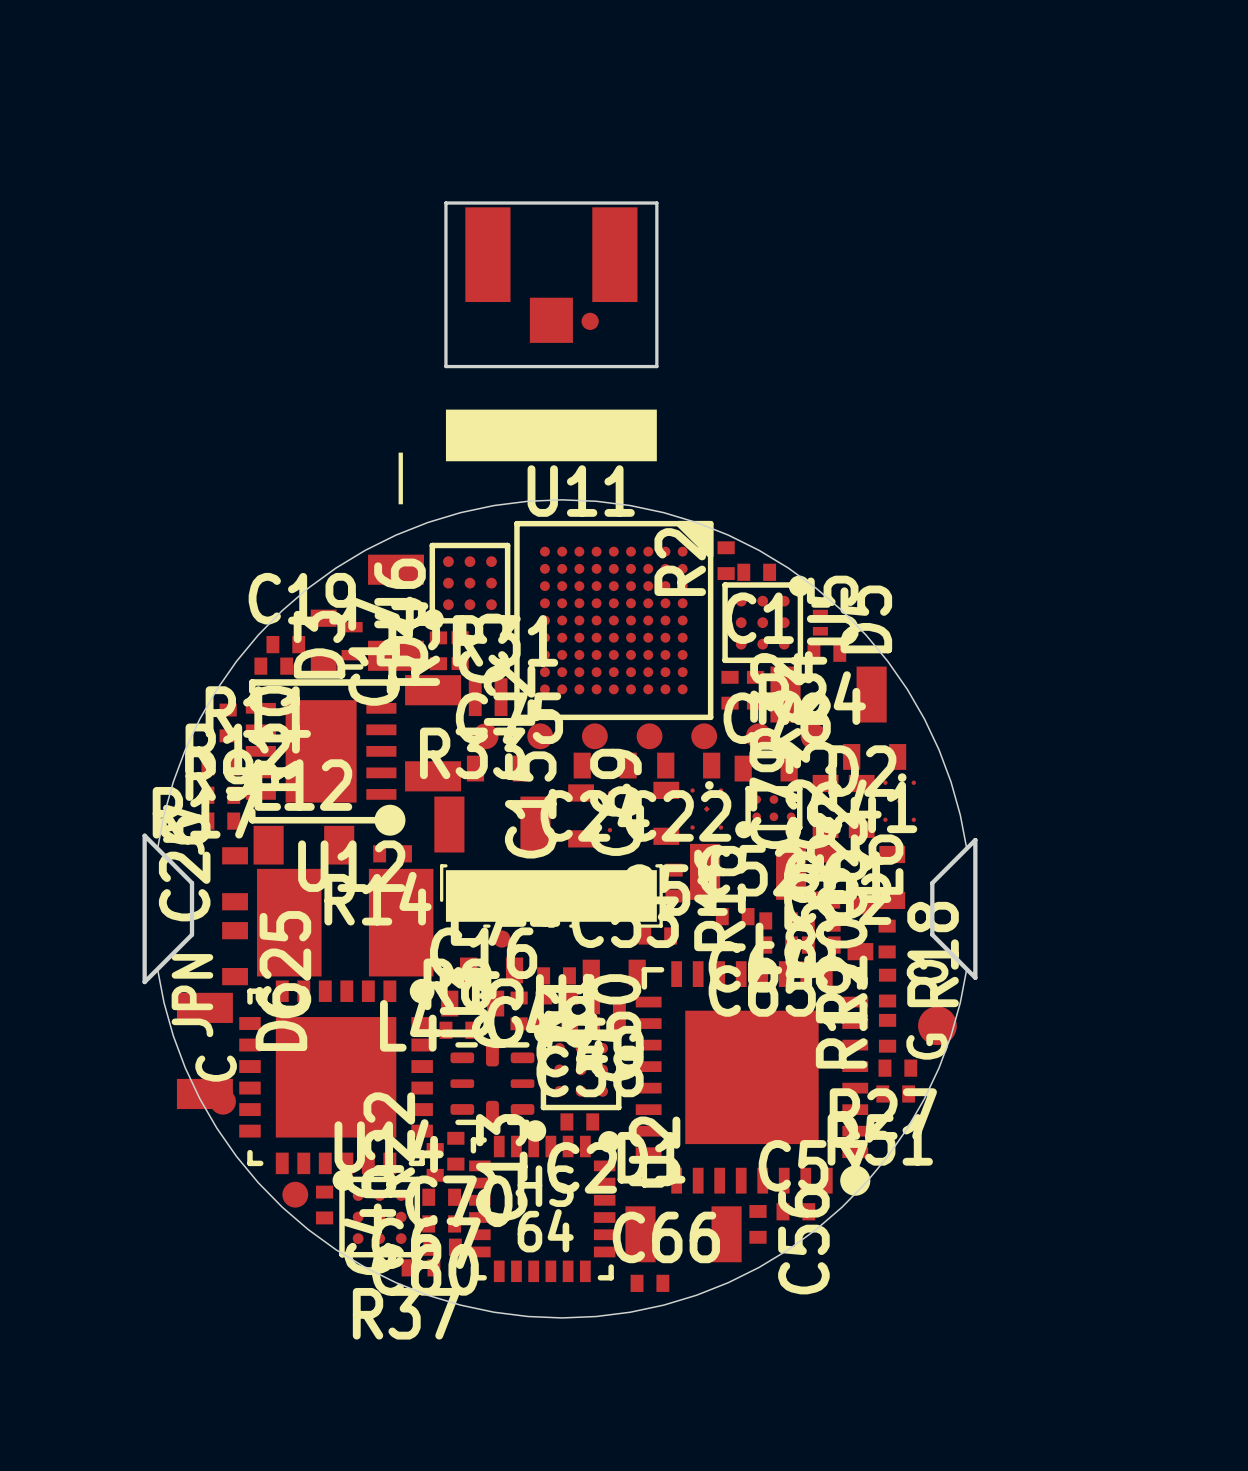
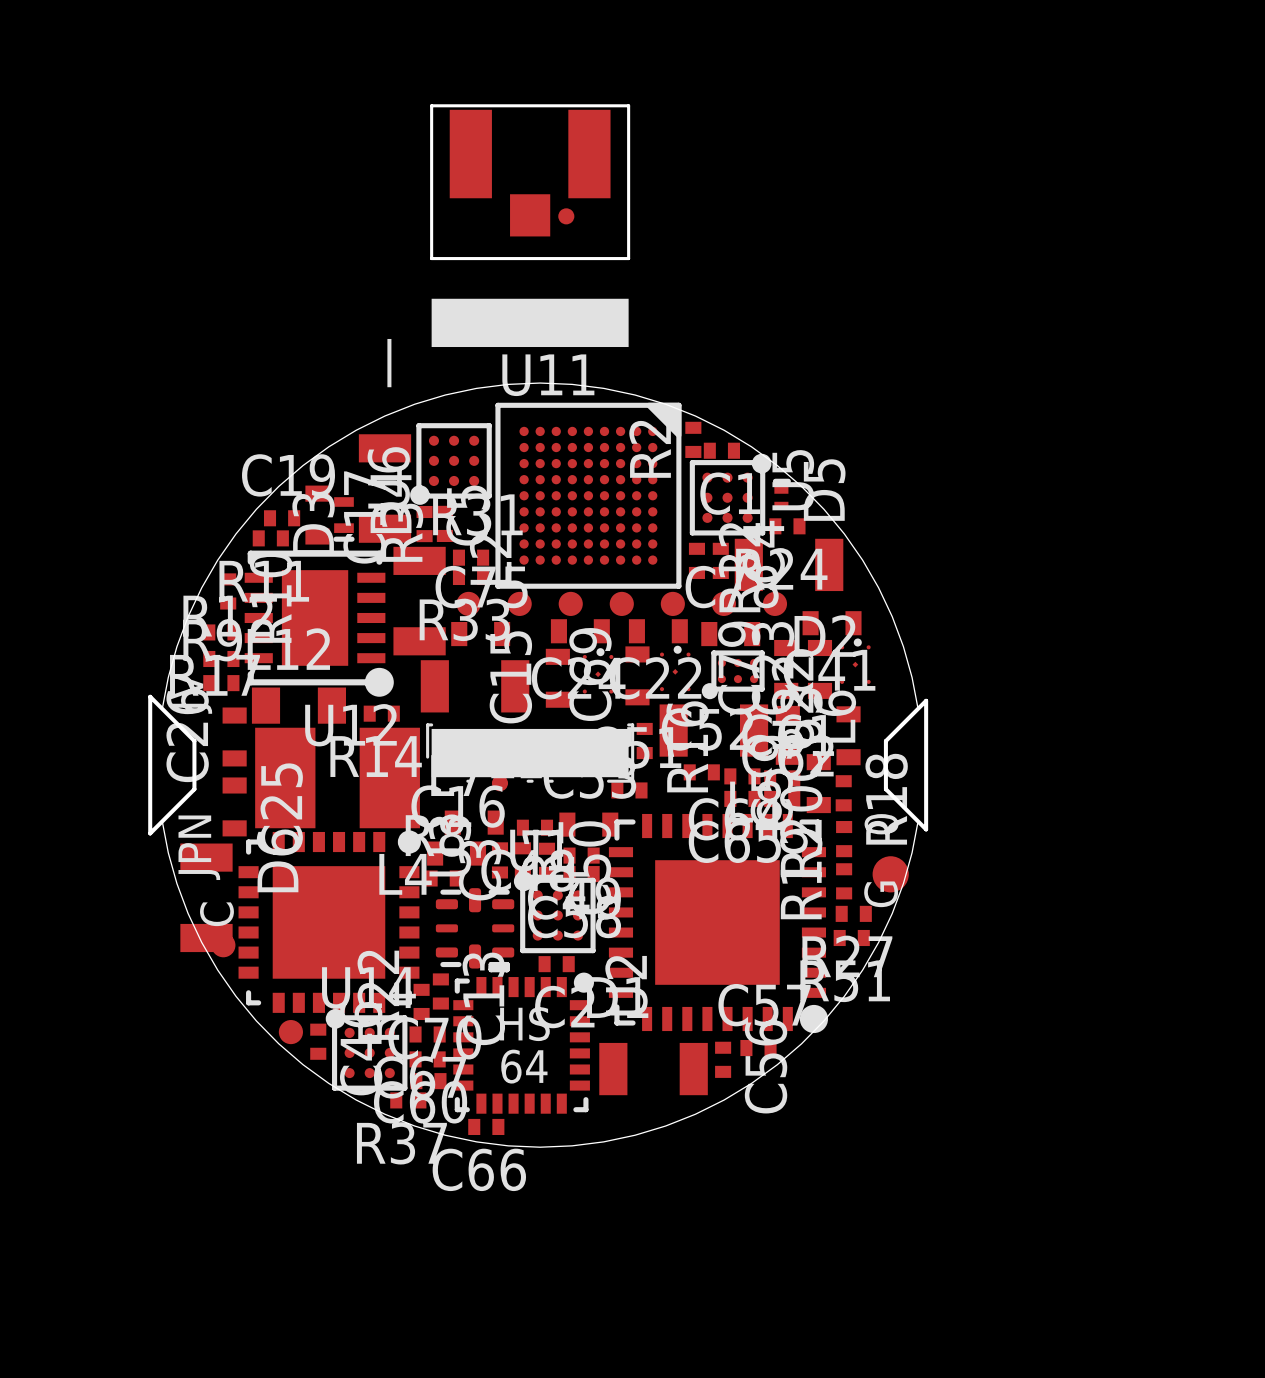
part position: (501, 939) -> (499, 783)
part footprint: [450, 1040, 547, 1142] -> [435, 888, 515, 973]
C66 name position: C66 (666, 1237) -> C66 (479, 1169)
C66 position: (649, 1283) -> (486, 1126)

